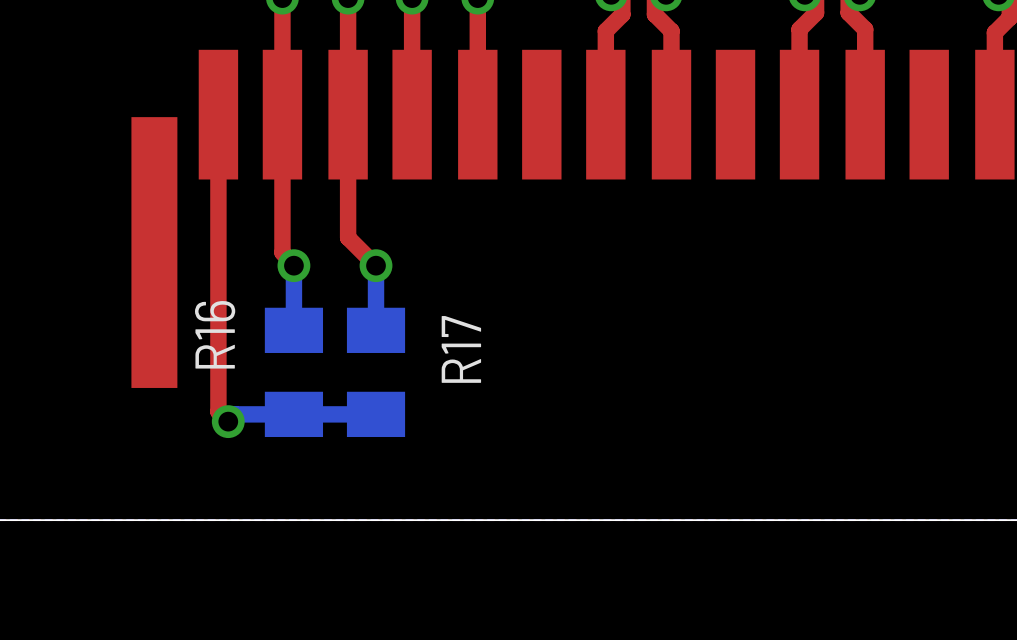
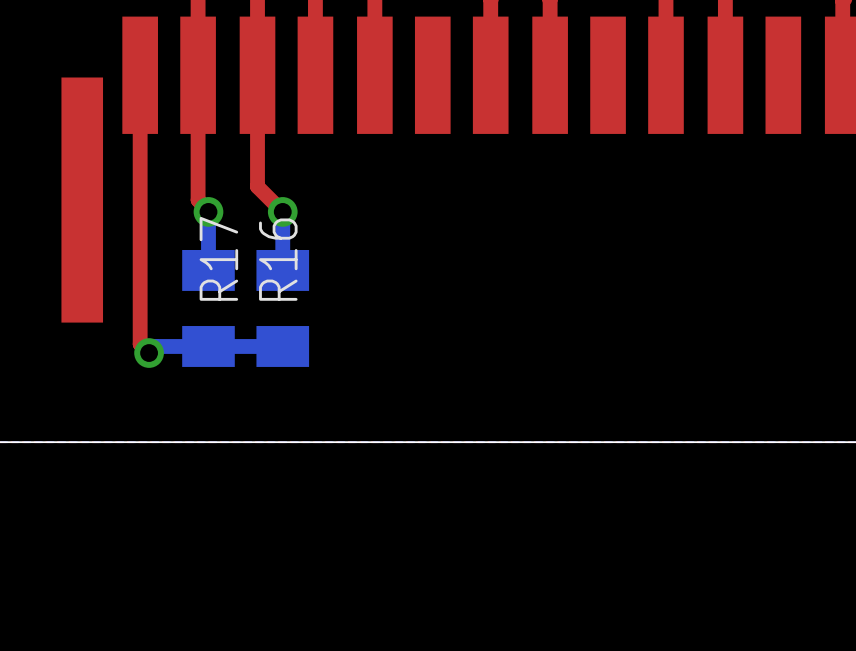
R16 name position: R16 (215, 334) -> R16 (278, 259)
R17 name position: R17 (461, 349) -> R17 (218, 258)

